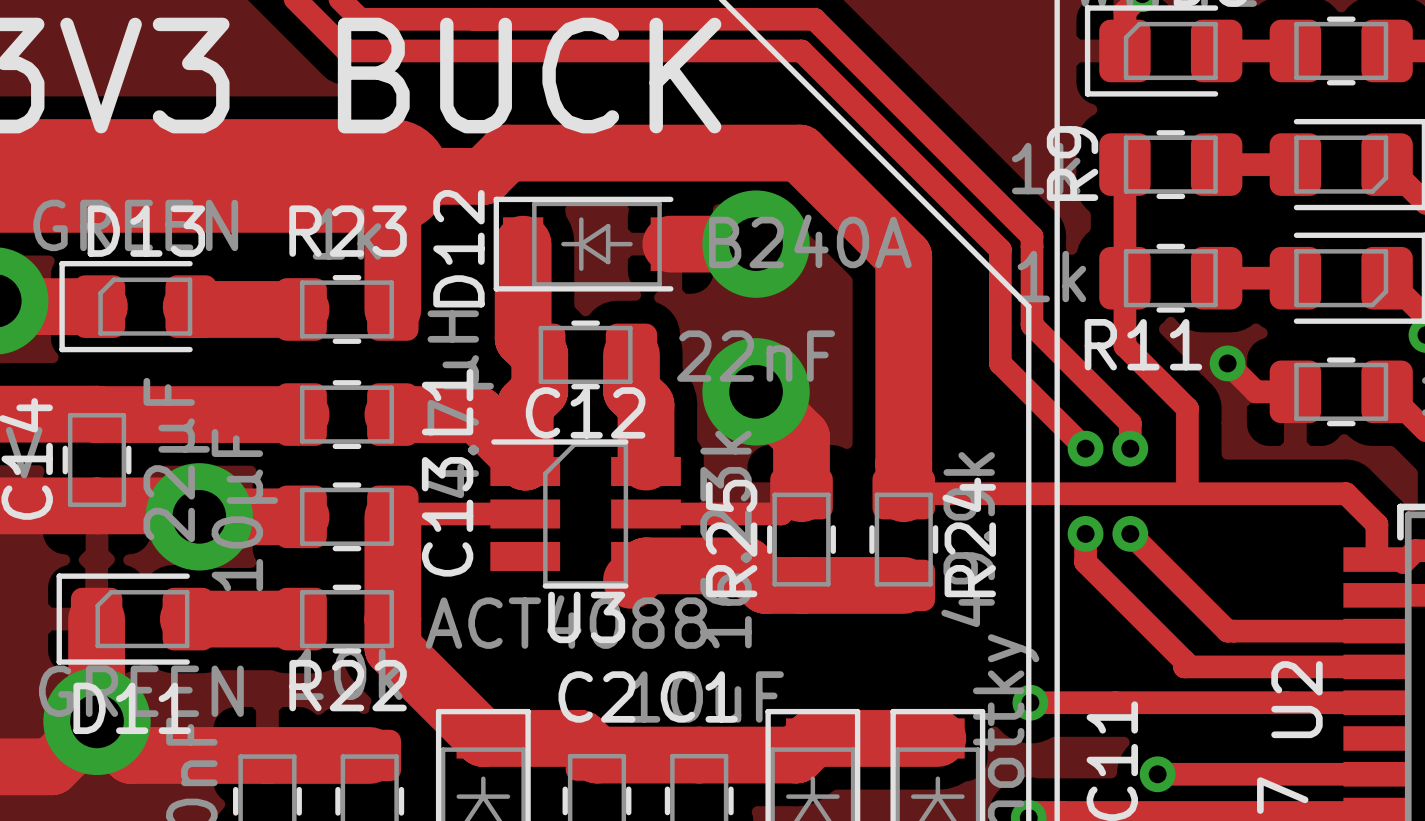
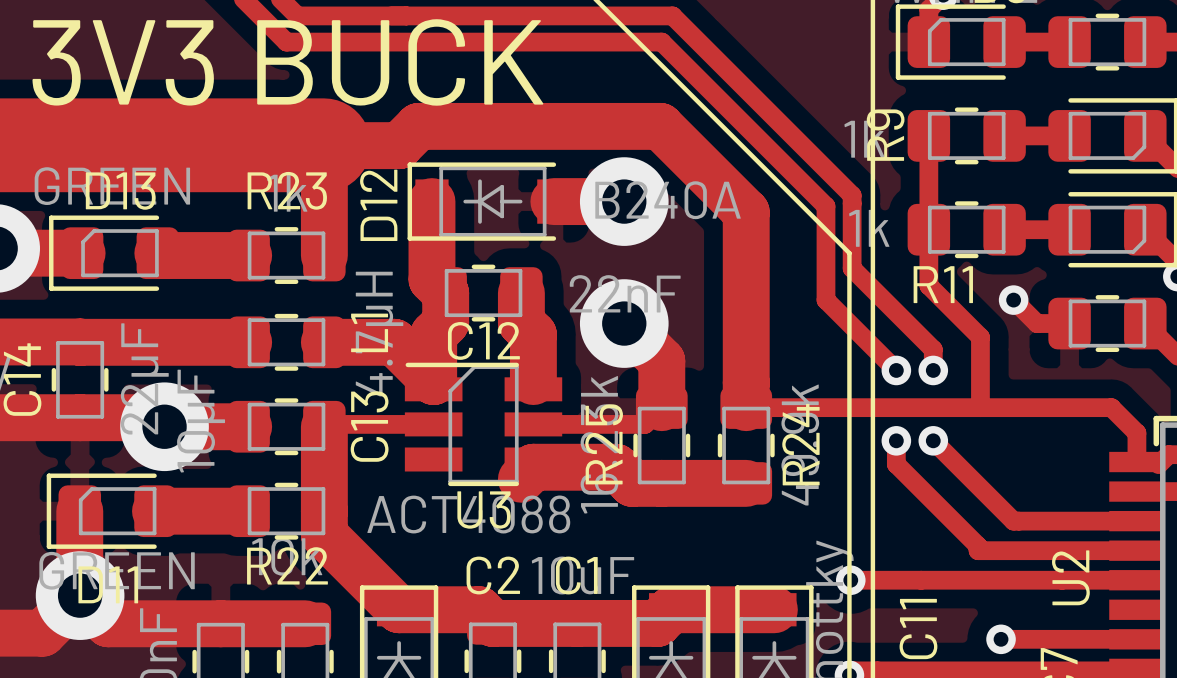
track: (1155, 774) (1212, 774) -> none
via position: (1157, 774) -> (1001, 639)

